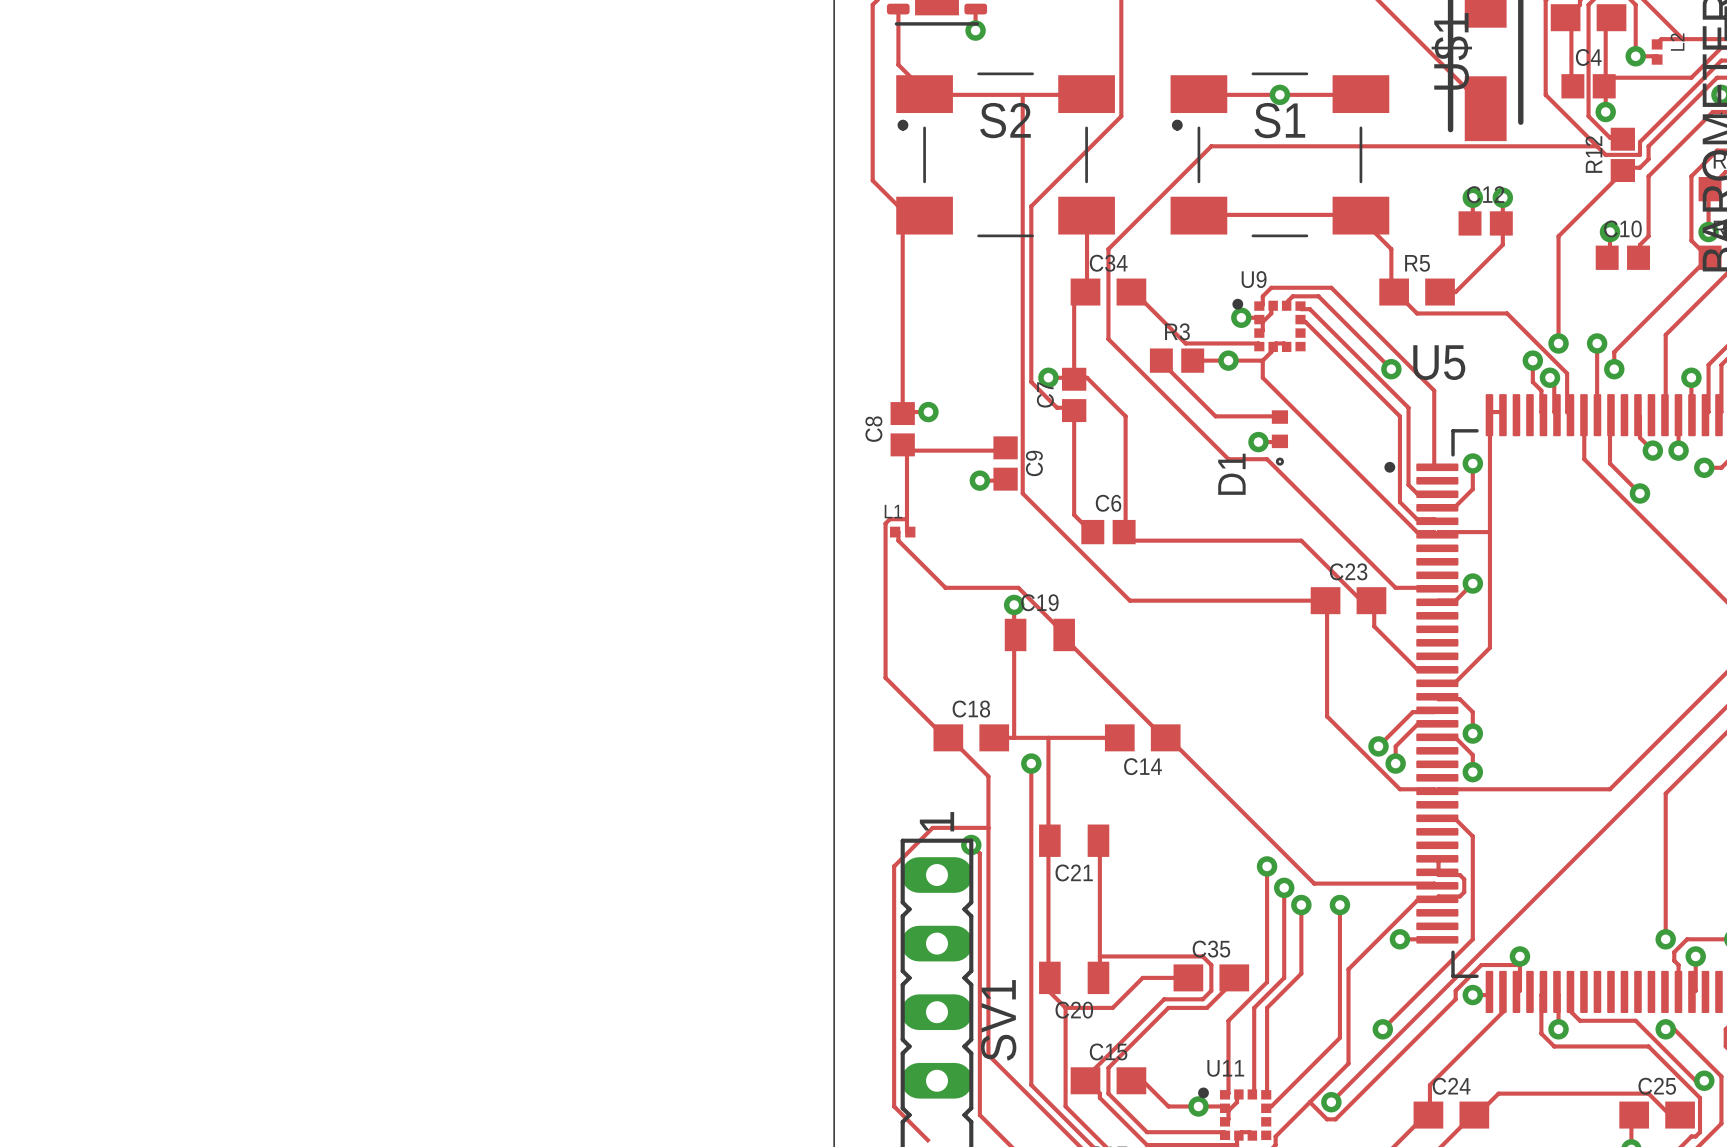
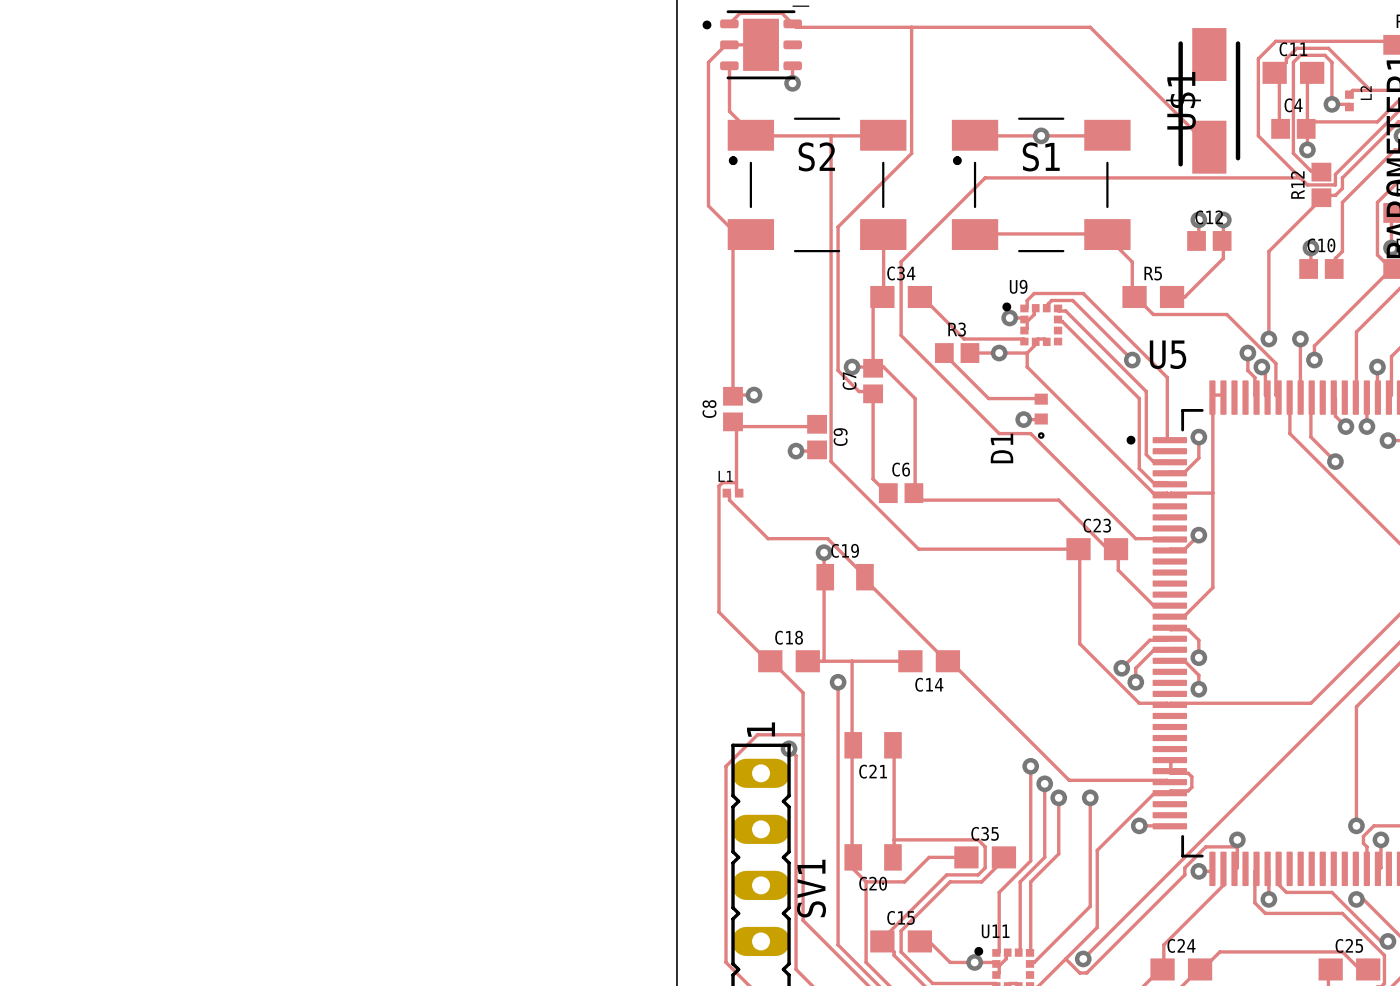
track: (1437, 818) (1455, 819) (1472, 836) (1472, 939) (1382, 1029) -> none
via: (1382, 1029) -> none

